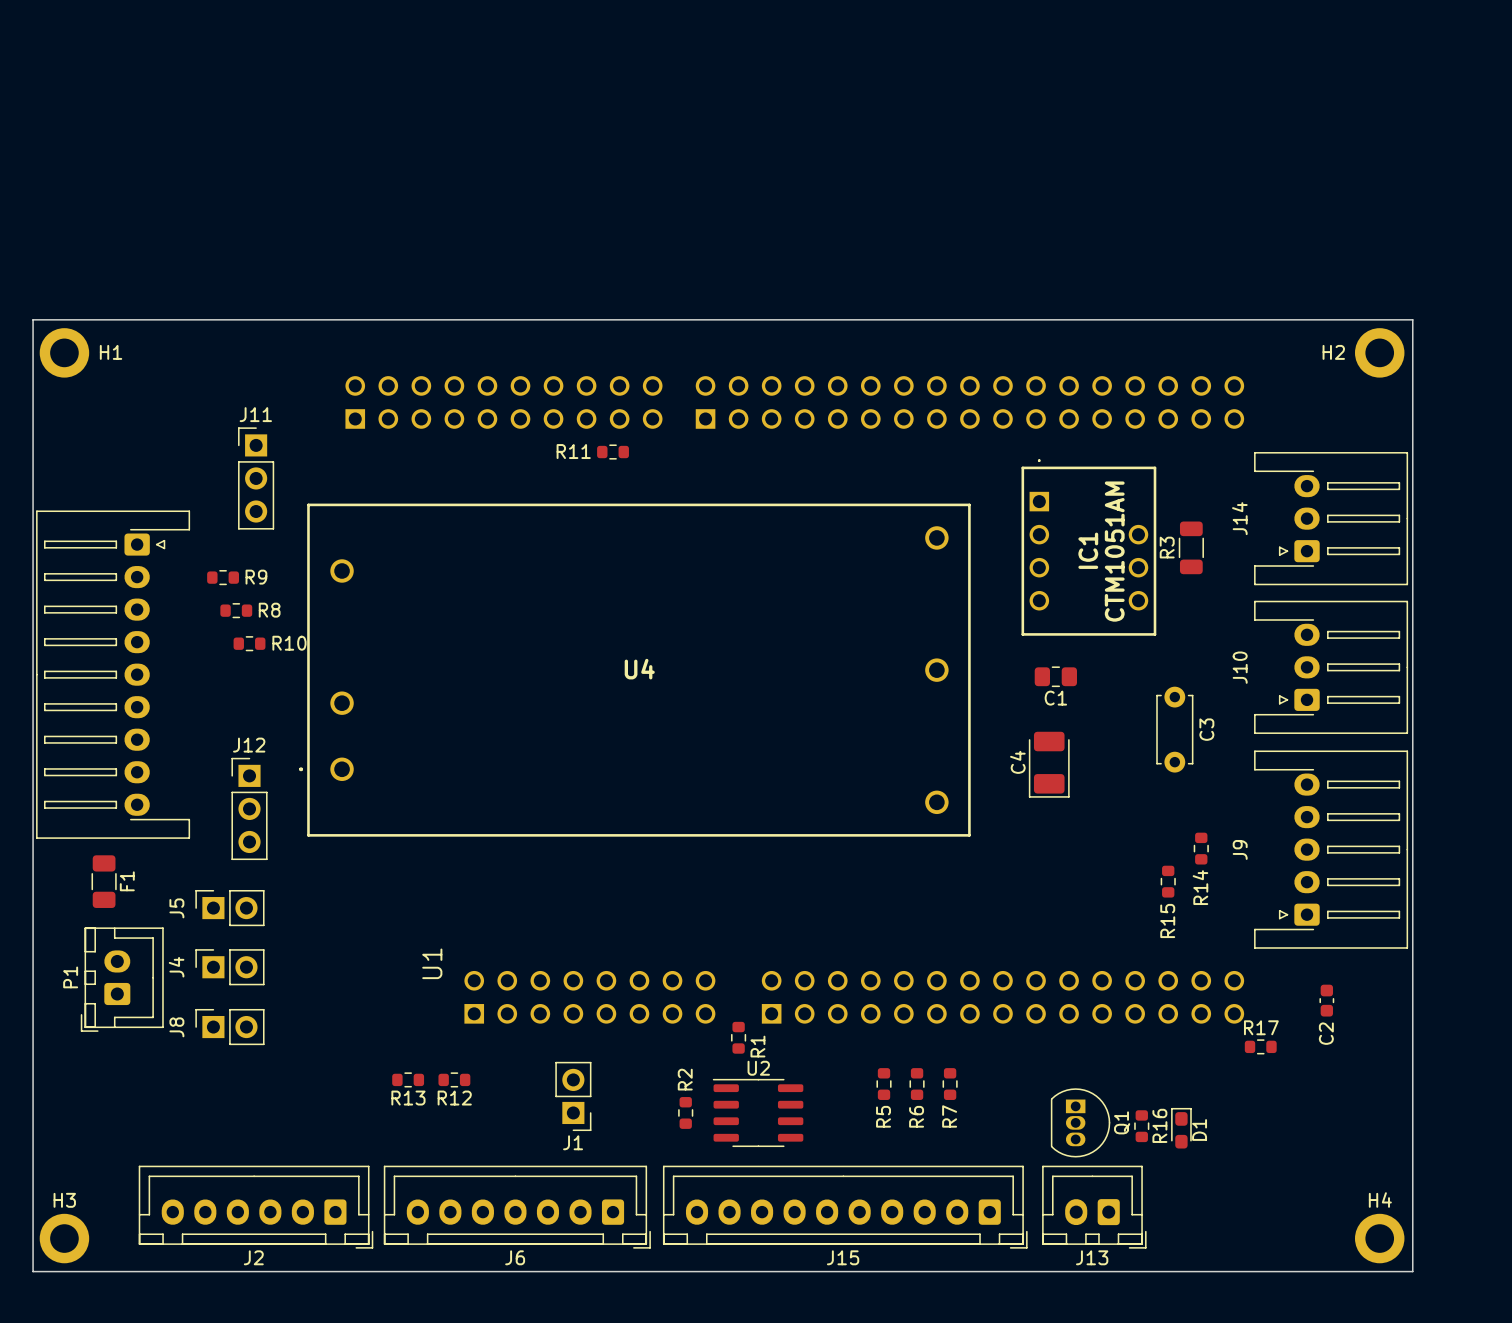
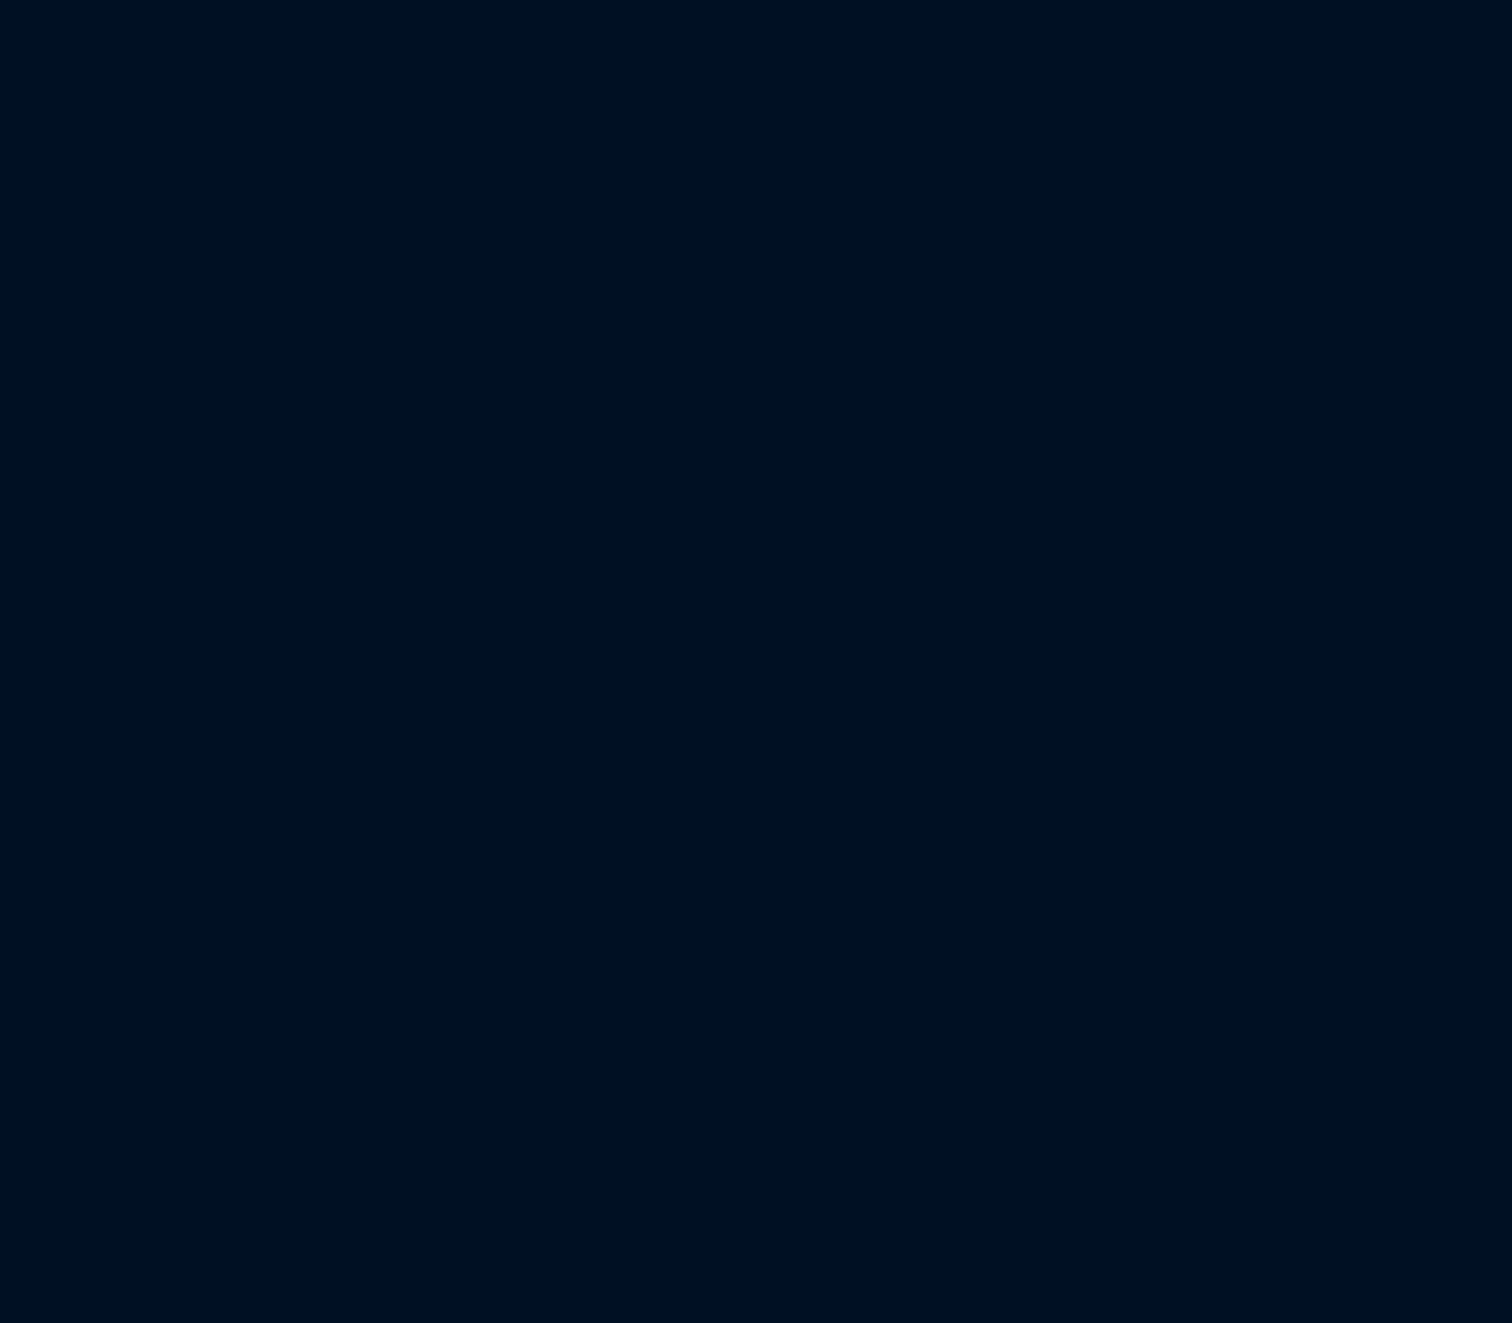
board edge: (33, 319) (1412, 319) (1412, 1271) (33, 1271) (33, 319) -> none
H1: (64, 352) -> none
H2: (1379, 352) -> none
R11: (613, 452) -> none
J11: (256, 478) -> none
J14: (1331, 518) -> none
IC1: CTM1051AM (1088, 547) -> none
R3: (1191, 547) -> none
R9: (223, 577) -> none
R8: (236, 610) -> none
R10: (249, 643) -> none
J10: (1331, 667) -> none
U4: (634, 670) -> none
part: (113, 674) -> none
C1: (1055, 676) -> none
U1: (794, 699) -> none
C3: (1174, 729) -> none
C4: (1049, 764) -> none
J12: (249, 808) -> none
R14: (1201, 848) -> none
J9: (1331, 849) -> none
F1: (104, 881) -> none
R15: (1168, 881) -> none
J5: (229, 908) -> none
J4: (229, 967) -> none
P1: (122, 979) -> none
C2: (1326, 1000) -> none
J8: (229, 1027) -> none
R1: (738, 1037) -> none
R17: (1260, 1046) -> none
R13: (408, 1079) -> none
R12: (454, 1079) -> none
R5: (884, 1084) -> none
R6: (917, 1084) -> none
R7: (950, 1084) -> none
J1: (573, 1096) -> none
R2: (685, 1112) -> none
U2: (758, 1112) -> none
Q1: (1080, 1122) -> none
R16: (1141, 1126) -> none
D1: (1181, 1128) -> none
J2: (256, 1207) -> none
J6: (517, 1207) -> none
J15: (845, 1207) -> none
J13: (1094, 1207) -> none
H3: (64, 1238) -> none
H4: (1379, 1238) -> none

